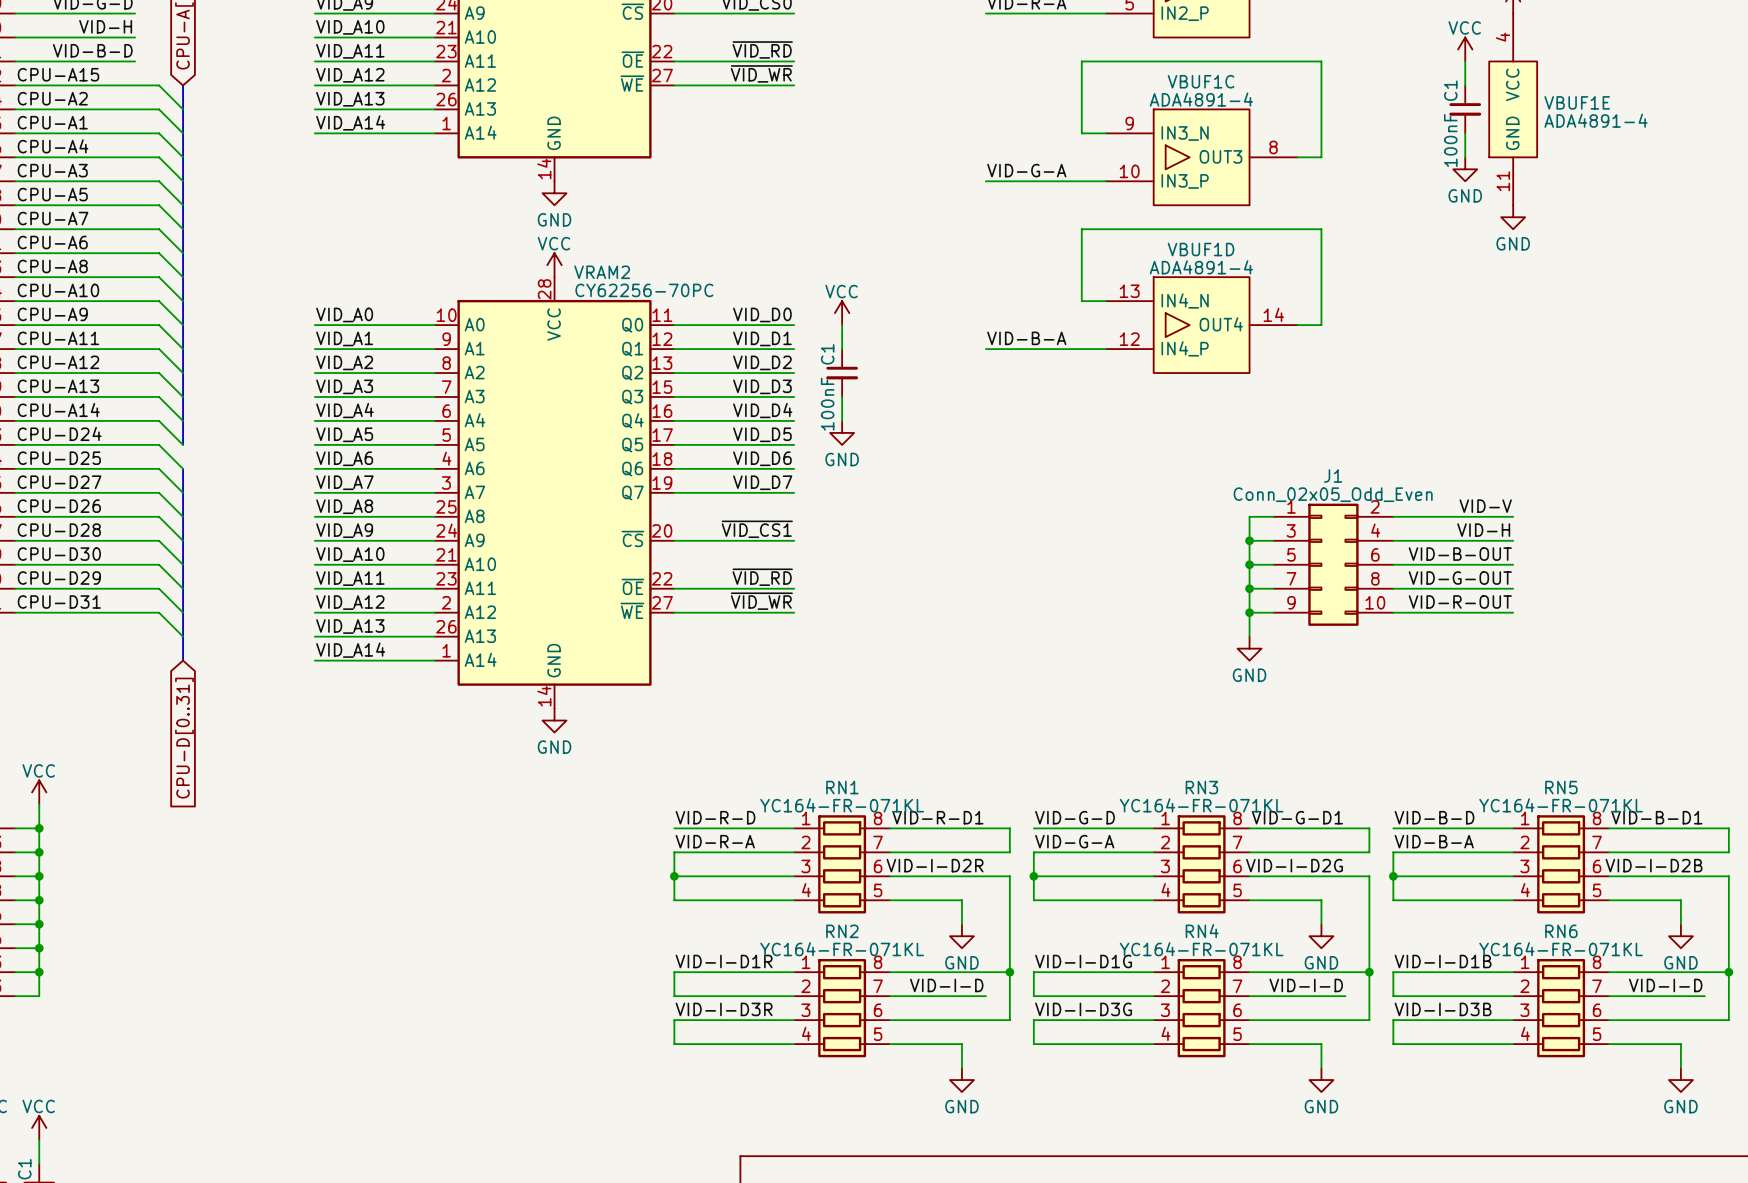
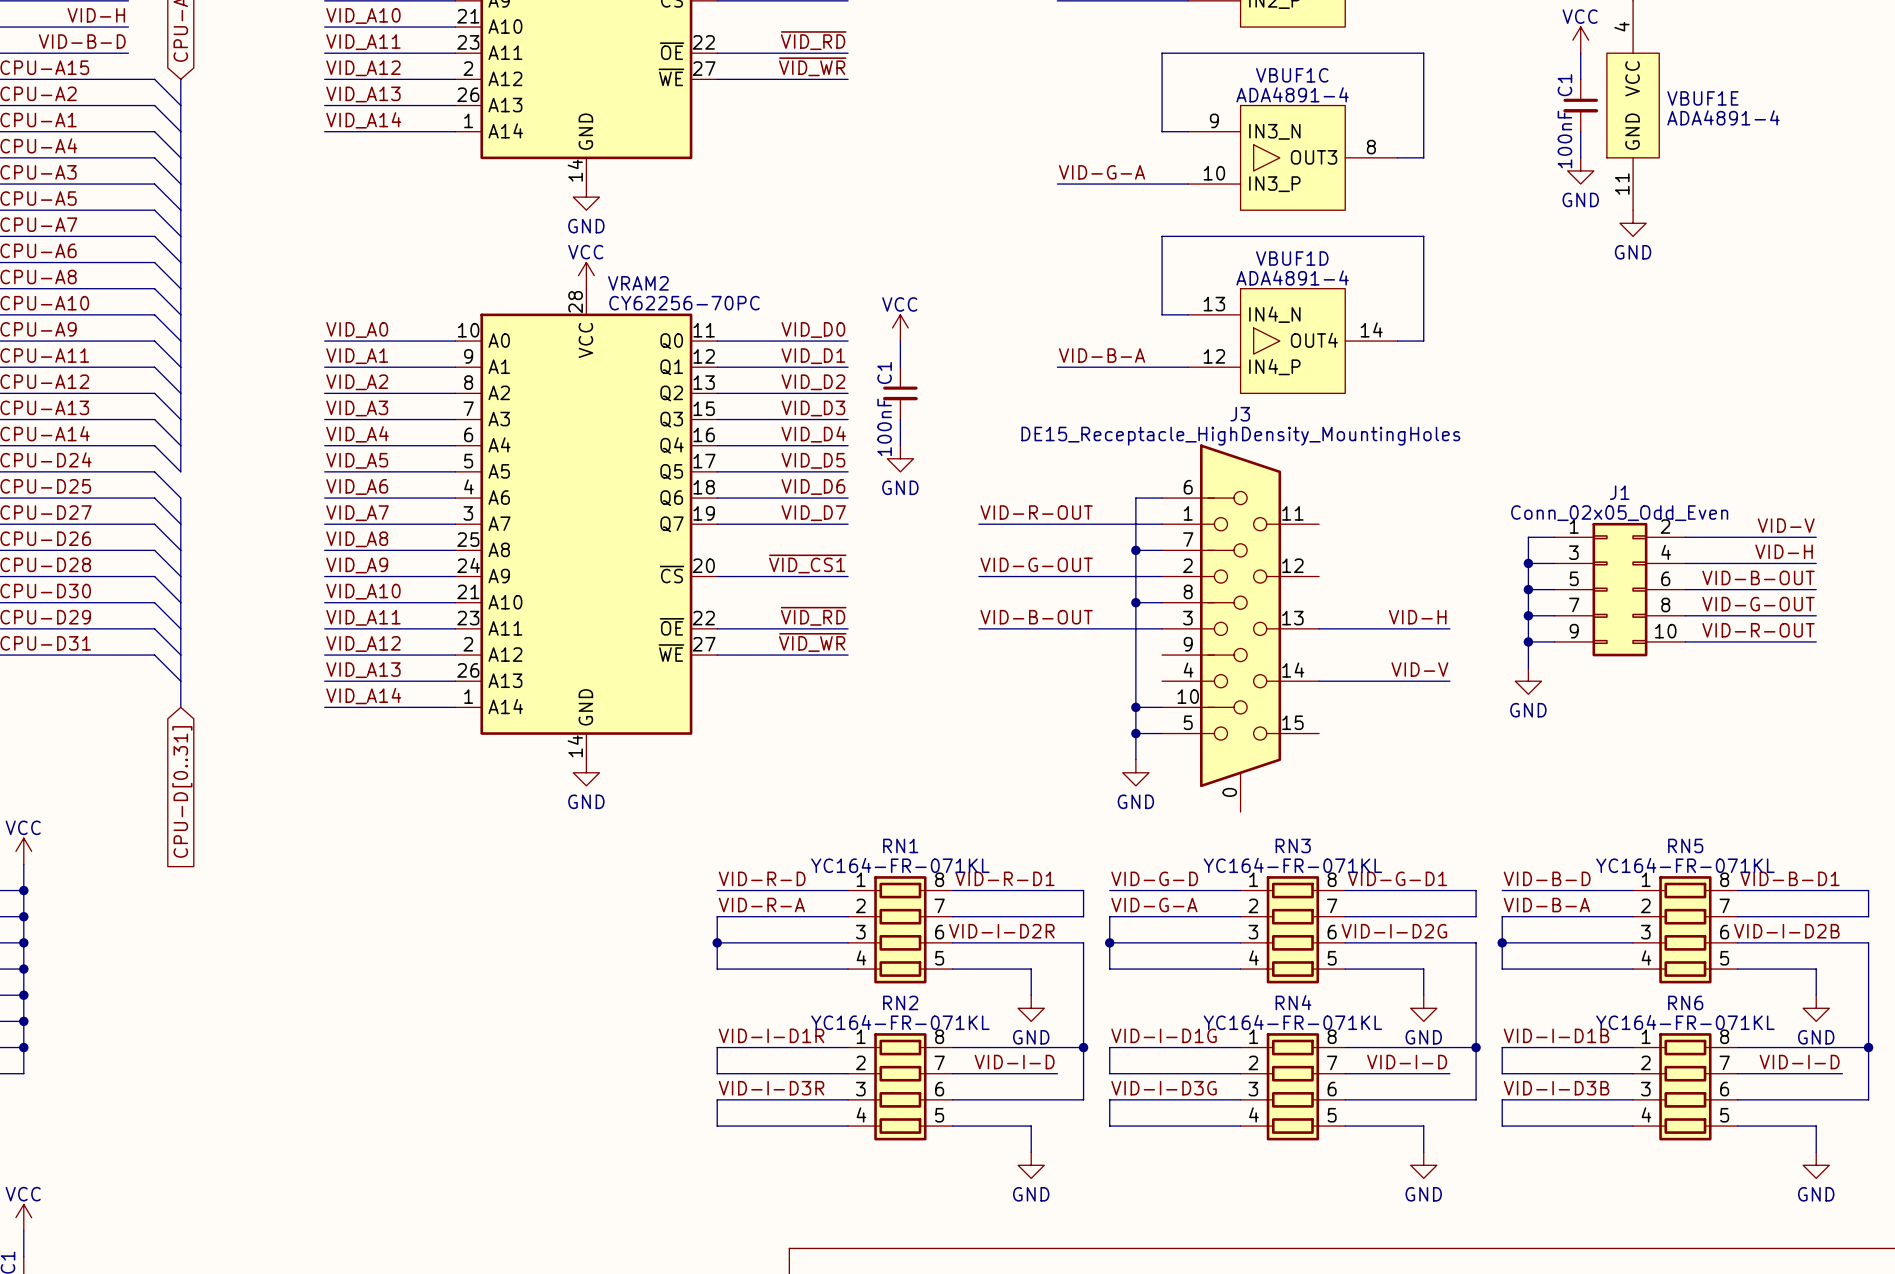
wire: none -> (1162, 498) (1135, 498) (1135, 759)
label: none -> VID-R-OUT (1036, 512)
wire: none -> (978, 524) (1162, 524)
label: none -> VID-V (1786, 525)
label: VID-V (1485, 506) -> none
wire: none -> (1135, 550) (1162, 550)
junction: none -> (1135, 550)
wire: (1273, 516) (1249, 516) (1249, 636) -> (1554, 537) (1528, 537) (1528, 668)
wire: (1393, 516) (1513, 516) -> (1685, 537) (1816, 537)
label: none -> VID-H (1784, 551)
junction: none -> (1528, 563)
label: none -> VID-G-OUT (1036, 564)
label: VID-H (1483, 530) -> none
wire: none -> (978, 576) (1162, 576)
wire: (1249, 540) (1273, 540) -> (1528, 563) (1554, 563)
junction: (1249, 540) -> none
wire: (1393, 540) (1513, 540) -> (1685, 563) (1816, 563)
junction: none -> (1528, 589)
label position: VID-B-OUT (1460, 554) -> VID-B-OUT (1758, 577)
wire: none -> (1135, 602) (1162, 602)
junction: none -> (1135, 602)
wire: (1249, 564) (1273, 564) -> (1528, 589) (1554, 589)
junction: (1249, 564) -> none
J1 position: (1333, 564) -> (1619, 589)
wire: (1393, 564) (1513, 564) -> (1685, 589) (1816, 589)
wire: none -> (1528, 615) (1554, 615)
junction: none -> (1528, 615)
label: none -> VID-B-OUT (1036, 617)
label: none -> VID-H (1417, 617)
label position: VID-G-OUT (1460, 578) -> VID-G-OUT (1758, 604)
wire: none -> (978, 628) (1162, 628)
J3: none -> DE15_Receptacle_HighDensity_MountingHoles (1240, 628)
wire: none -> (1319, 628) (1345, 628)
junction: (1249, 588) -> none
wire: (1393, 588) (1513, 588) -> (1685, 615) (1816, 615)
junction: none -> (1528, 641)
label position: VID-R-OUT (1460, 602) -> VID-R-OUT (1758, 630)
wire: (1249, 612) (1273, 612) -> (1528, 641) (1554, 641)
junction: (1249, 612) -> none
wire: (1393, 612) (1513, 612) -> (1685, 641) (1816, 641)
label: none -> VID-V (1419, 669)
wire: none -> (1319, 681) (1449, 681)
power symbol: none -> GND (1528, 681)
power symbol: GND (1249, 648) -> none
wire: none -> (1135, 707) (1162, 707)
junction: none -> (1135, 707)
wire: none -> (1135, 733) (1162, 733)
junction: none -> (1135, 733)
power symbol: none -> GND (1135, 772)

